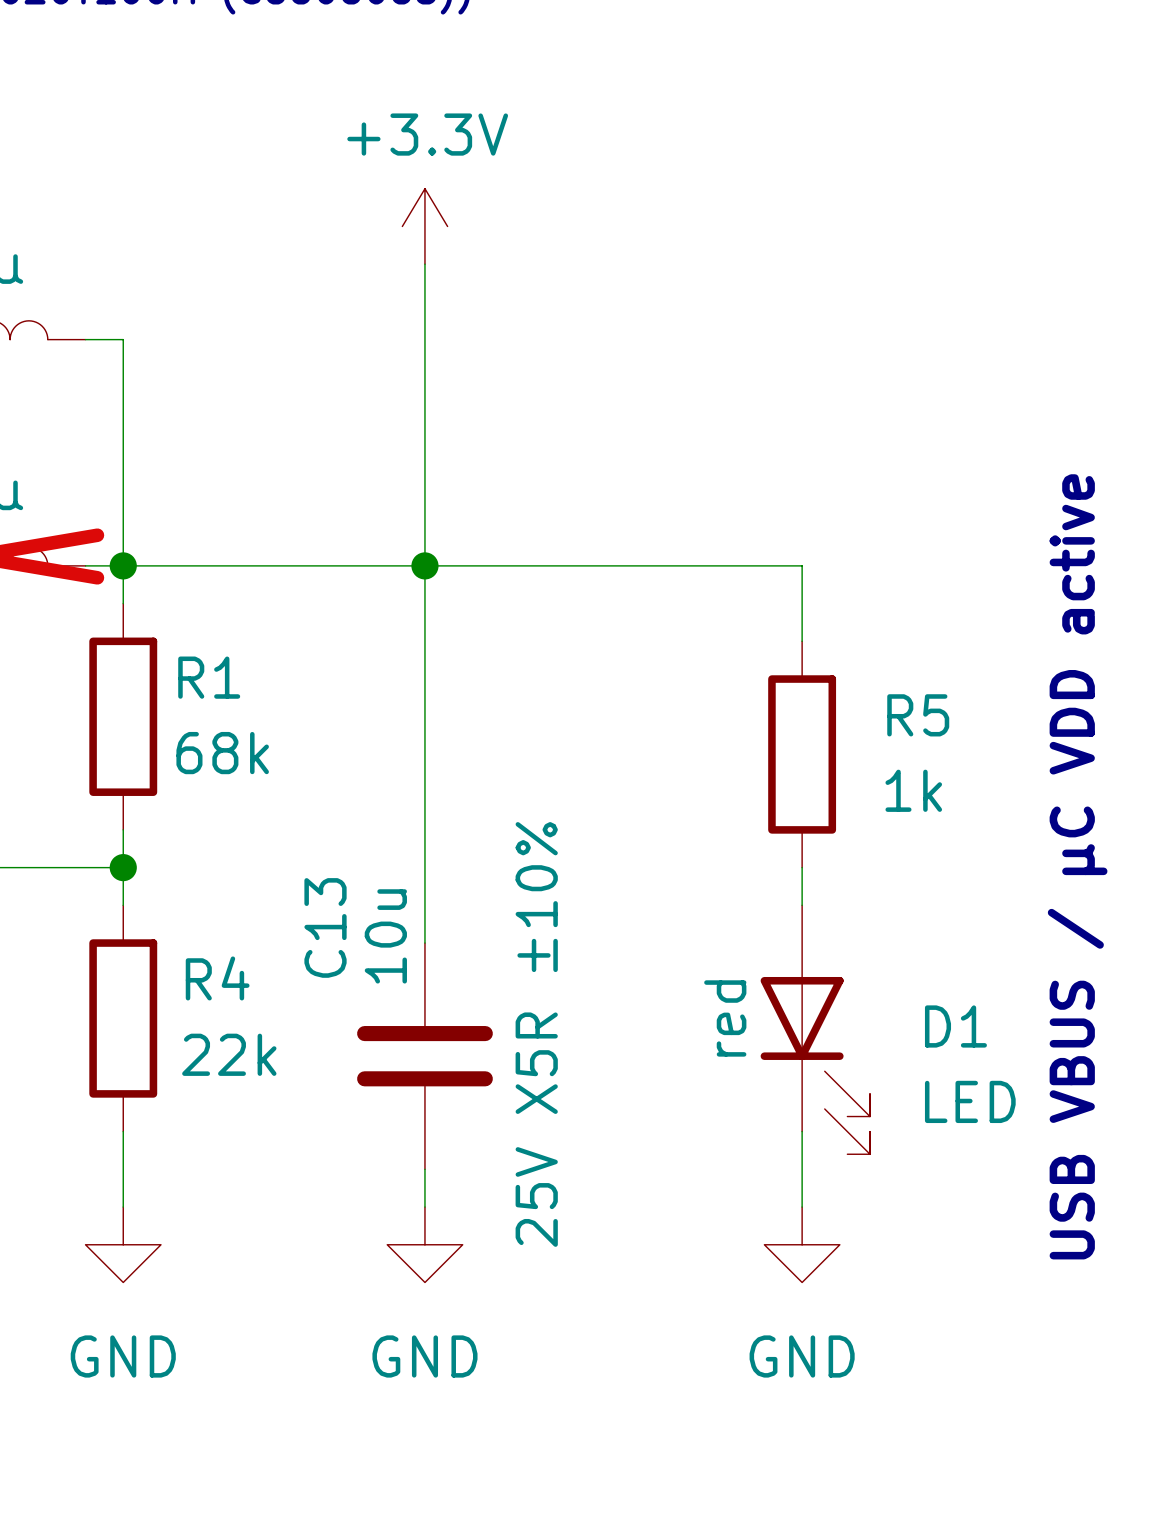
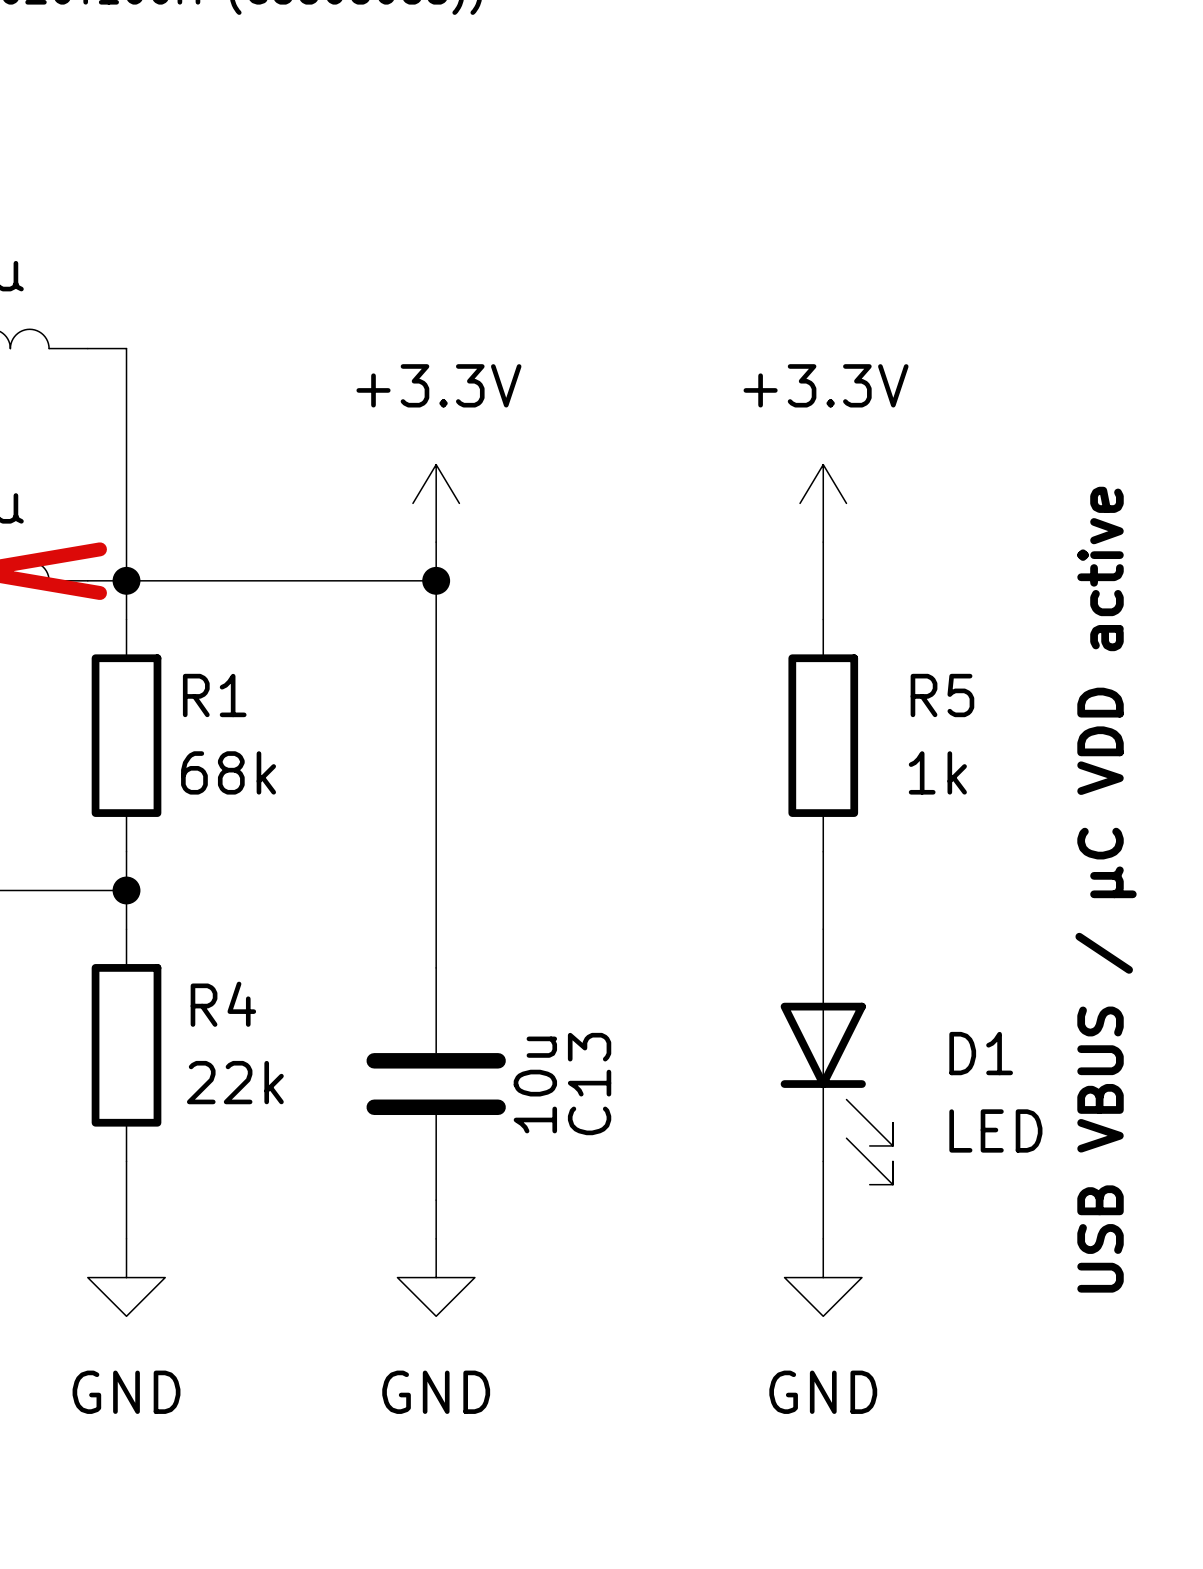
power symbol: +3.3V (424, 226) -> none
wire: (424, 264) (424, 528) -> none
power symbol: none -> +3.3V (436, 503)
power symbol: none -> +3.3V (823, 503)
wire: (424, 565) (802, 565) -> (823, 542) (823, 580)
R5 position: (802, 754) -> (823, 735)
C13 name position: C13 (325, 927) -> C13 (589, 1084)
C13 value position: 10u (385, 936) -> 10u (535, 1084)
D1 text: red (725, 1018) -> none
C13 text: 25V X5R ±10% (536, 1034) -> none

